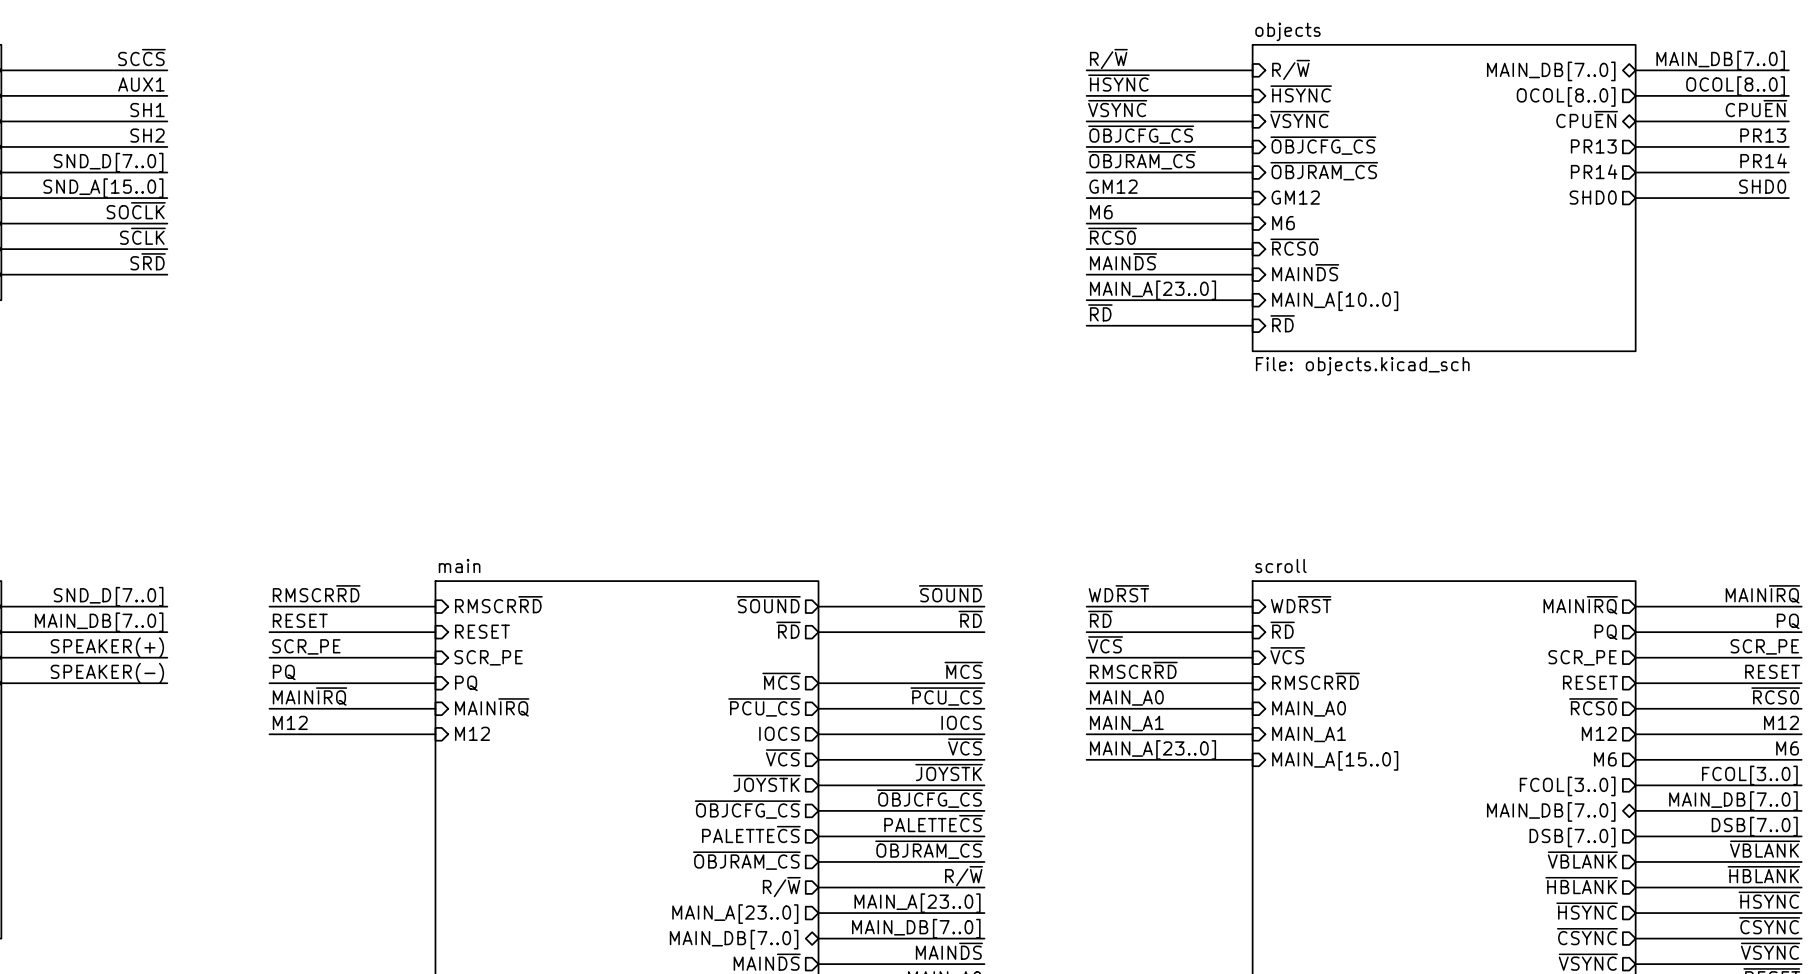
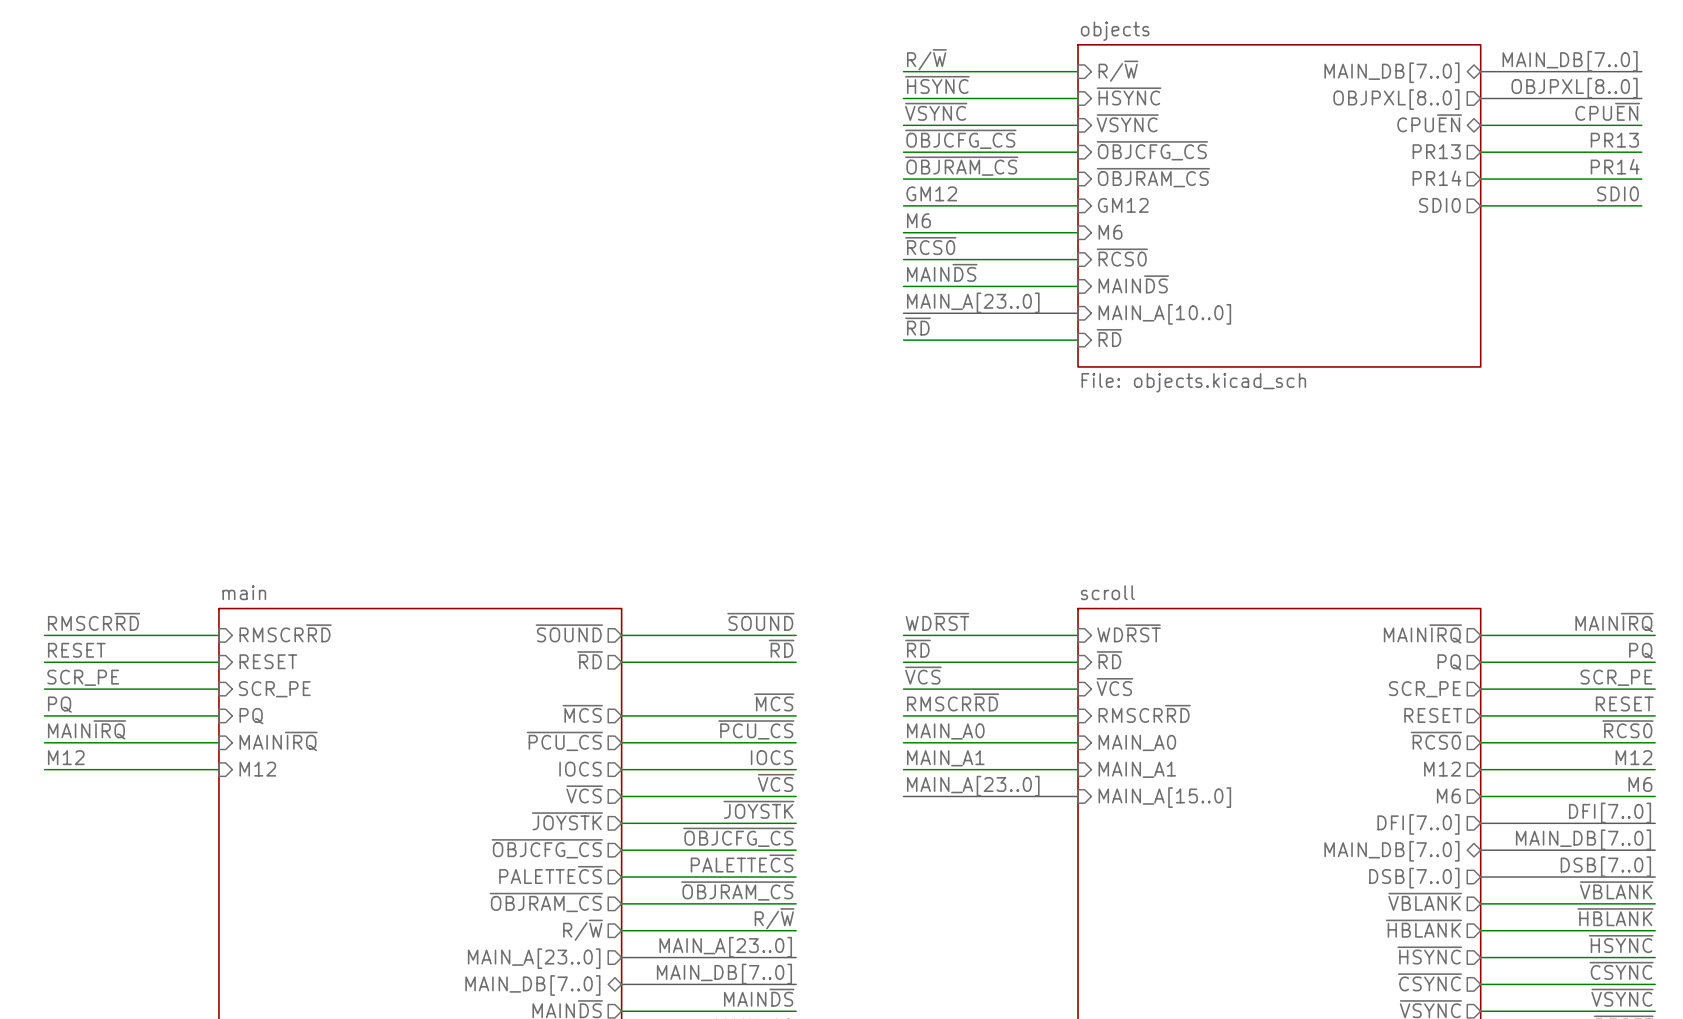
label: OCOL[8..0] (1735, 86) -> OBJPXL[8..0] (1574, 88)
sheet pin: OCOL[8..0] (1566, 96) -> OBJPXL[8..0] (1396, 99)
label: SHD0 (1762, 186) -> SDI0 (1618, 193)
sheet pin: SHD0 (1593, 197) -> SDI0 (1439, 205)
label: FCOL[3..0] (1749, 775) -> DFI[7..0] (1610, 812)
sheet pin: FCOL[3..0] (1567, 786) -> DFI[7..0] (1418, 824)

